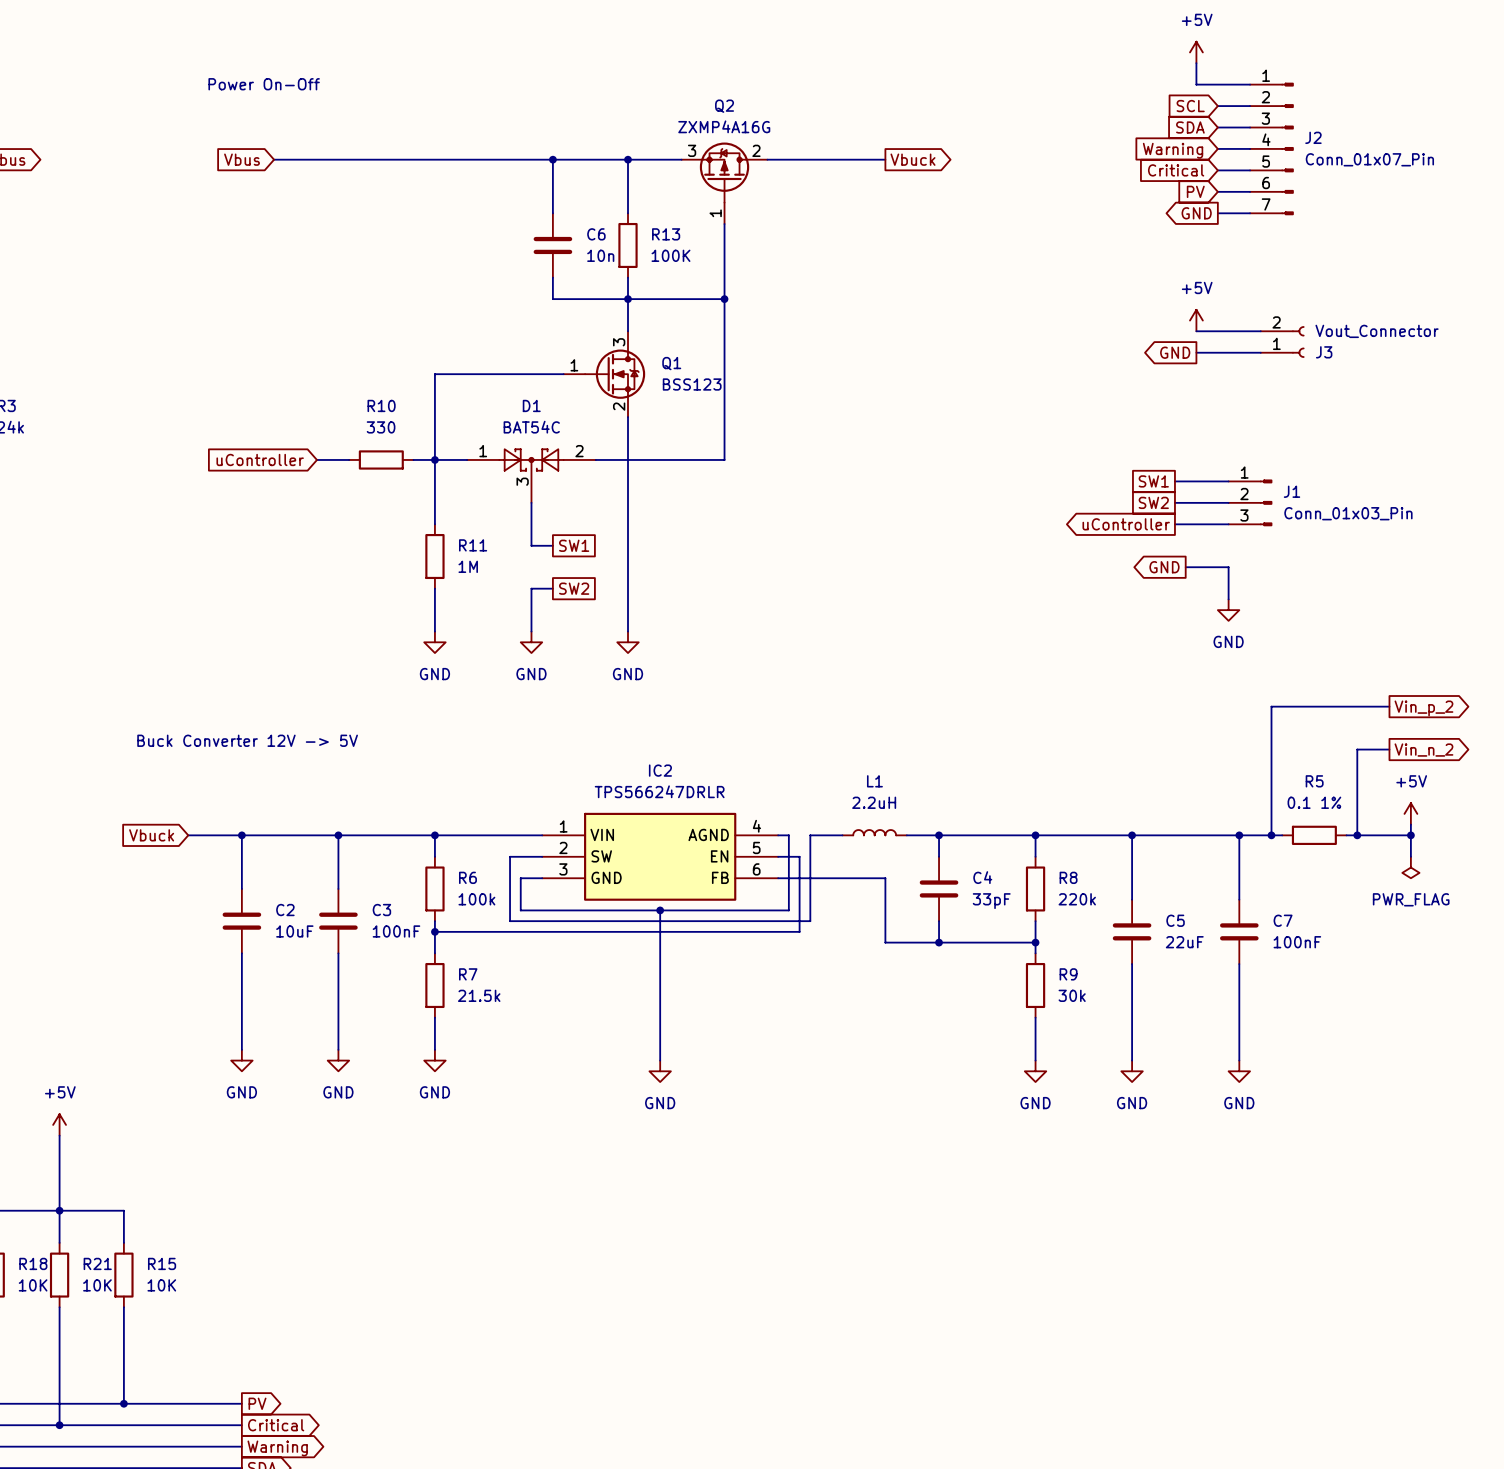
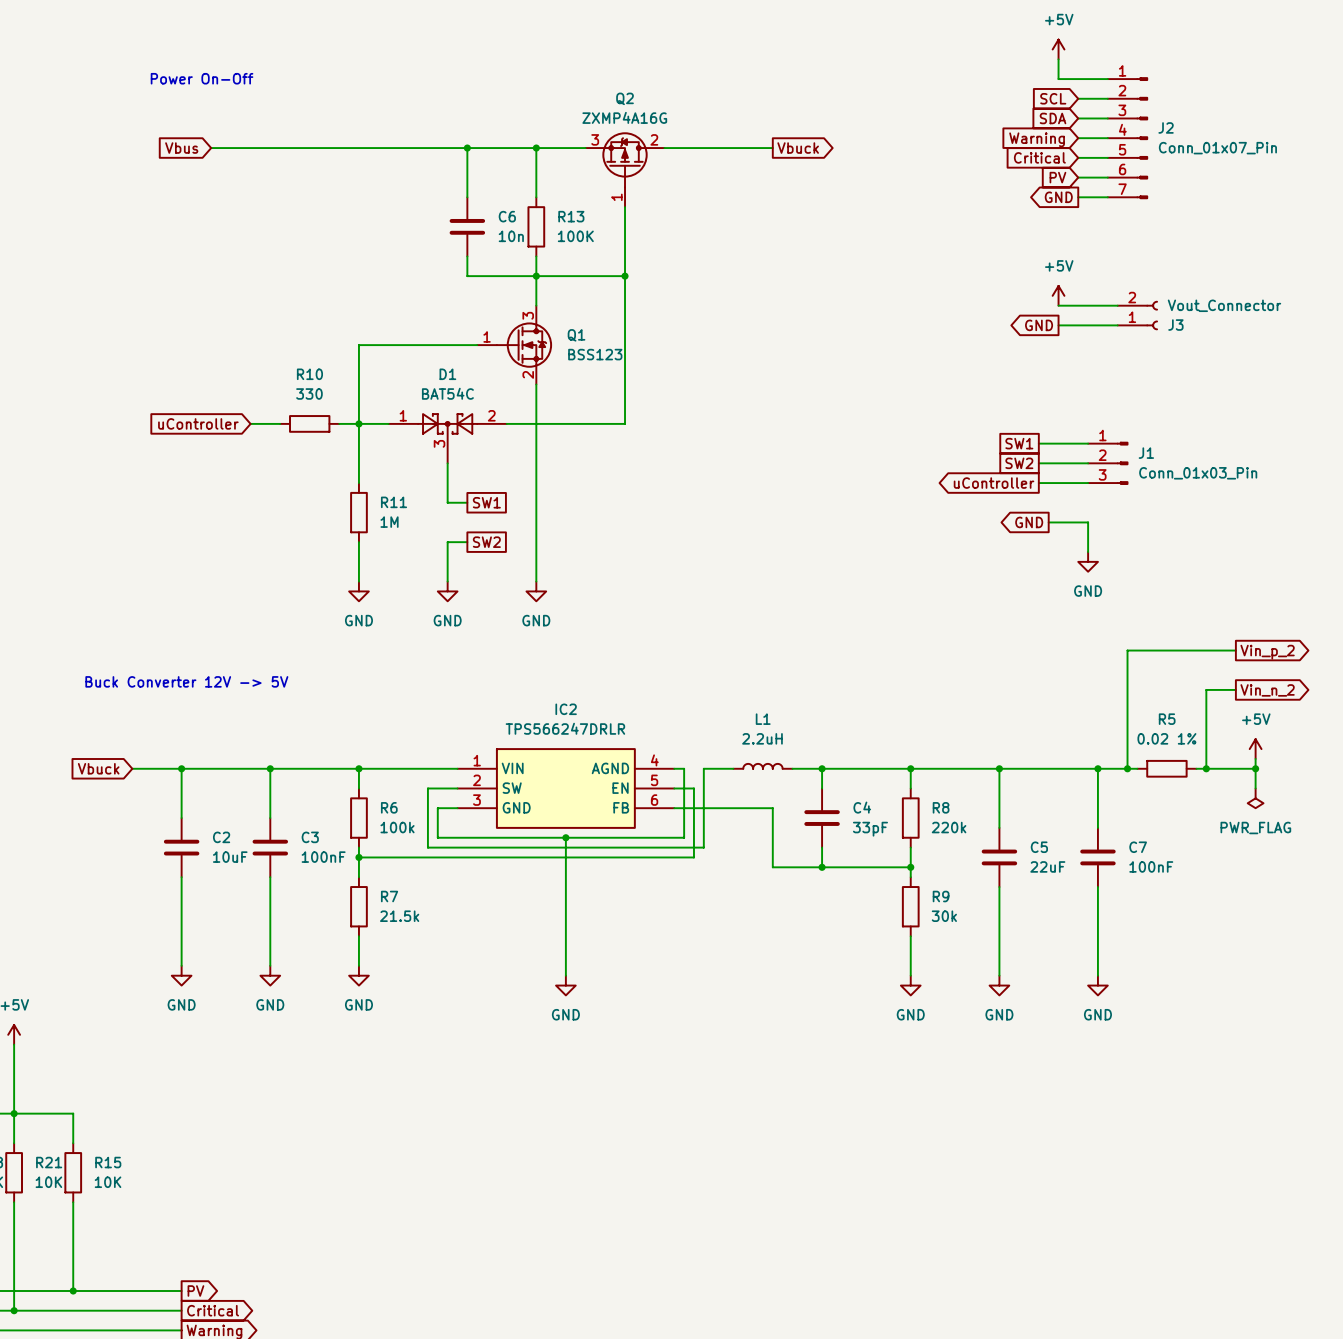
R5 value: 0.1 1% (1314, 802) -> 0.02 1% (1166, 738)

